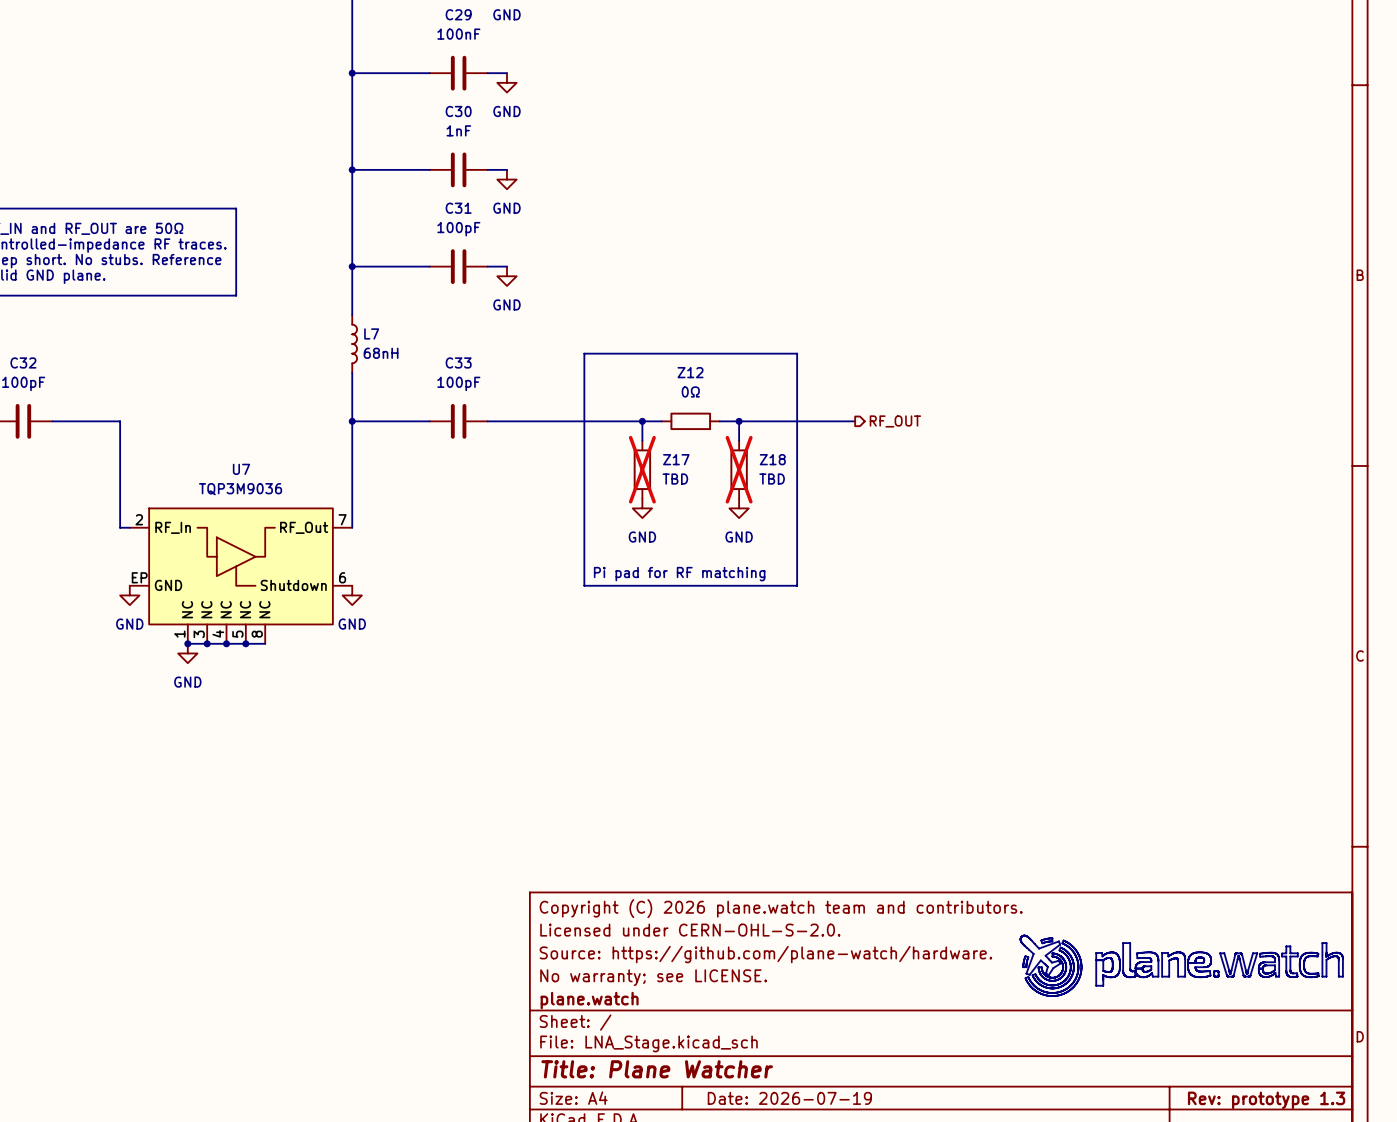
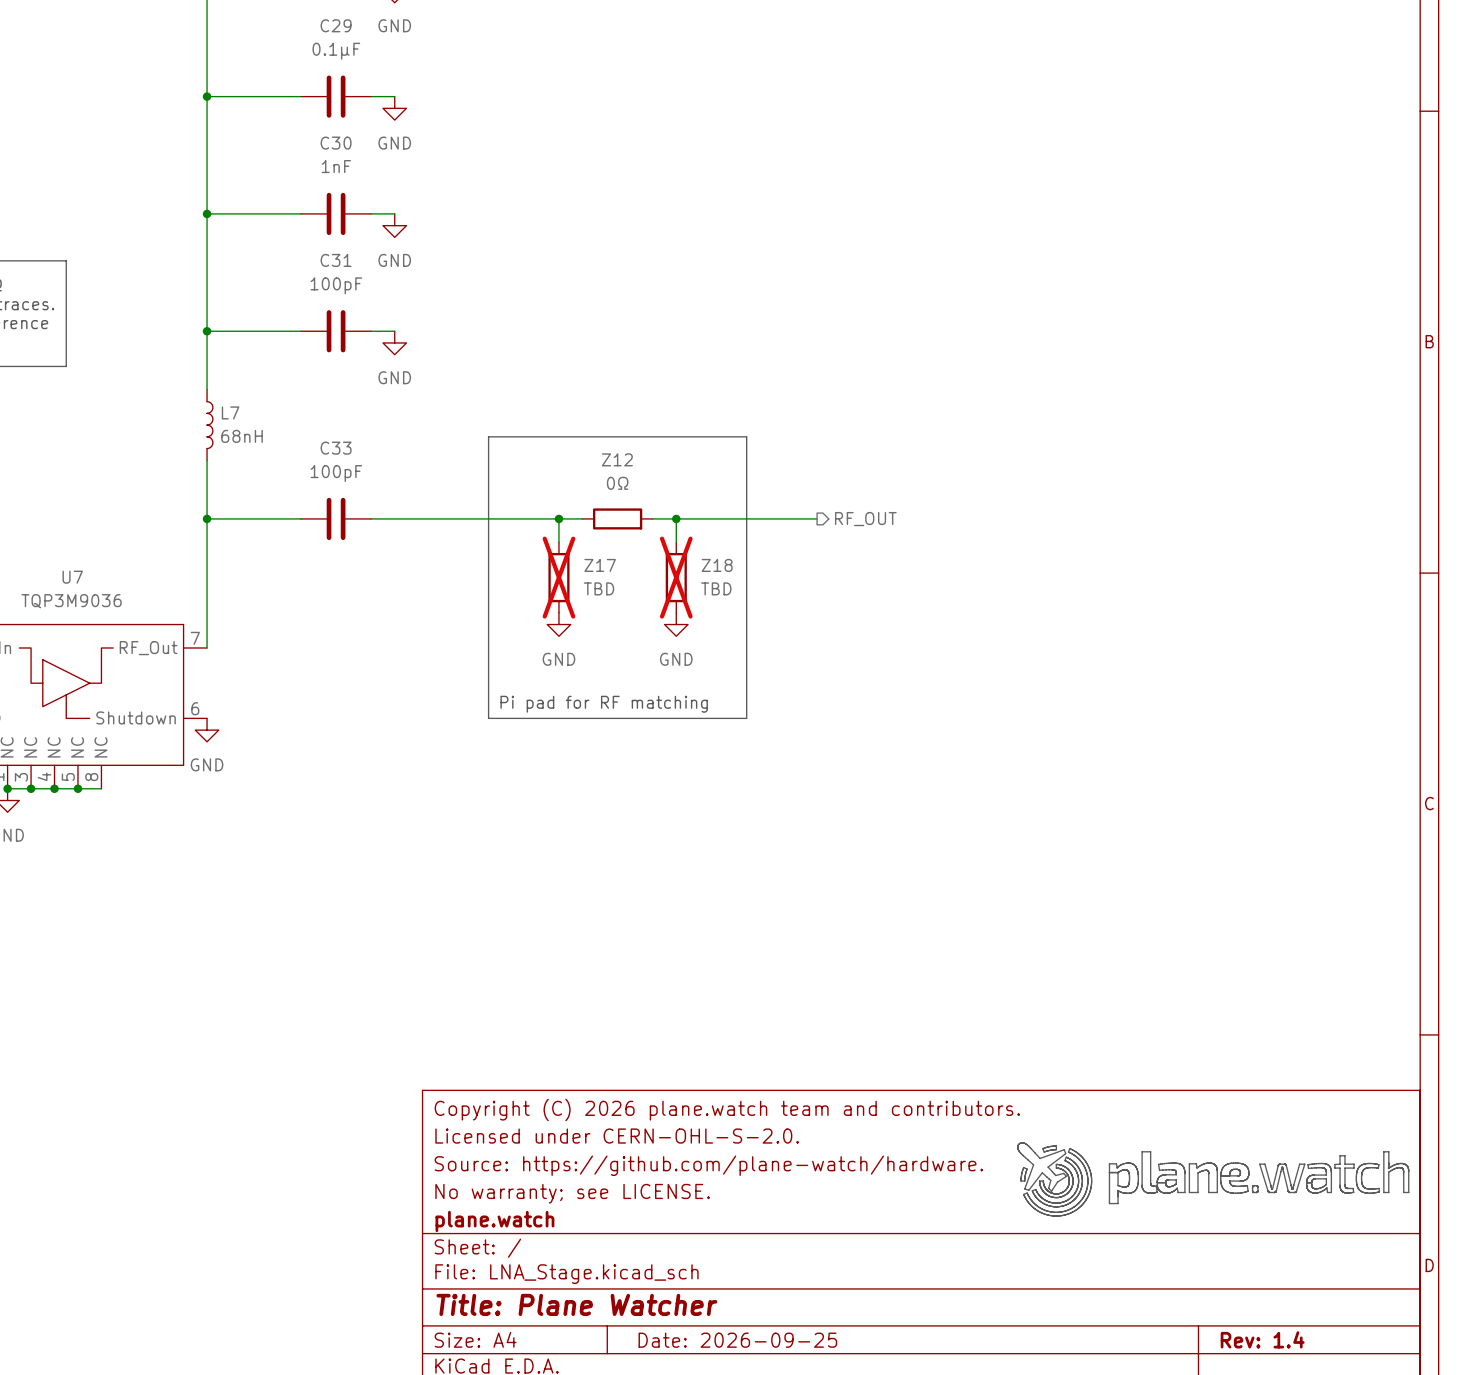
C29 value: 100nF (458, 34) -> 0.1µF (336, 51)
title block: Date: 2026-07-19 (789, 1098) -> Date: 2026-09-25 (737, 1340)
title block: Rev: prototype 1.3 (1266, 1100) -> Rev: 1.4 (1262, 1339)

